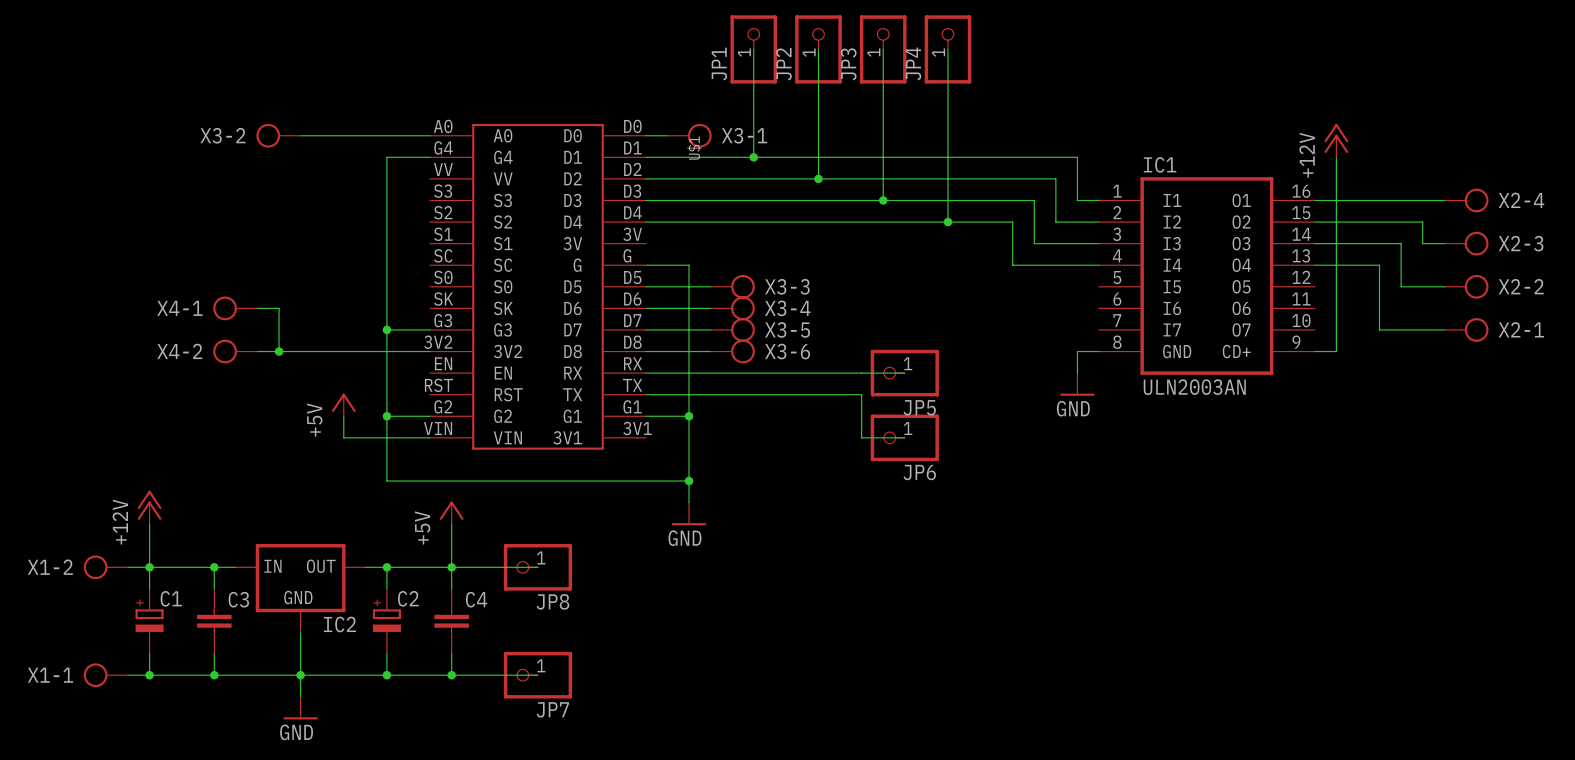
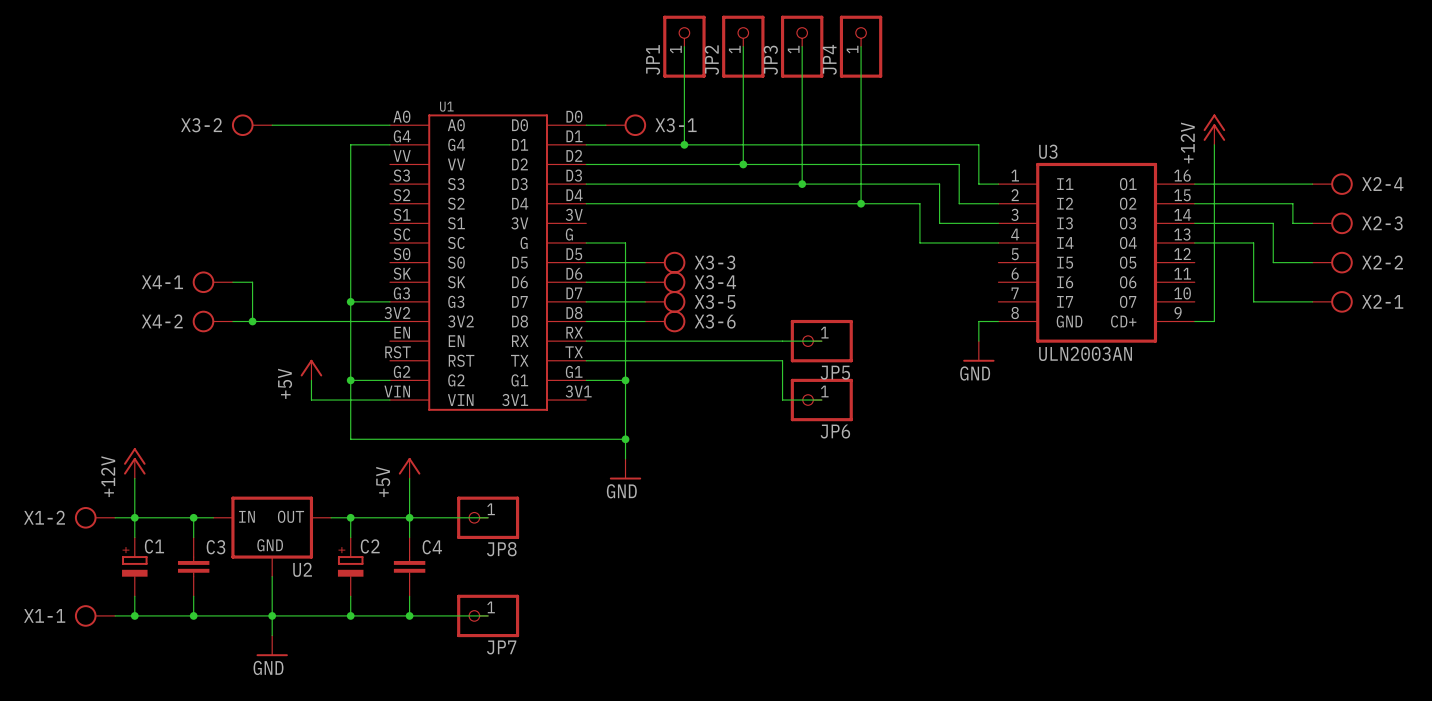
U$1 name: U$1 (694, 148) -> U1 (446, 106)
IC1 name: IC1 (1160, 164) -> U3 (1048, 151)
IC2 name: IC2 (339, 624) -> U2 (302, 569)

